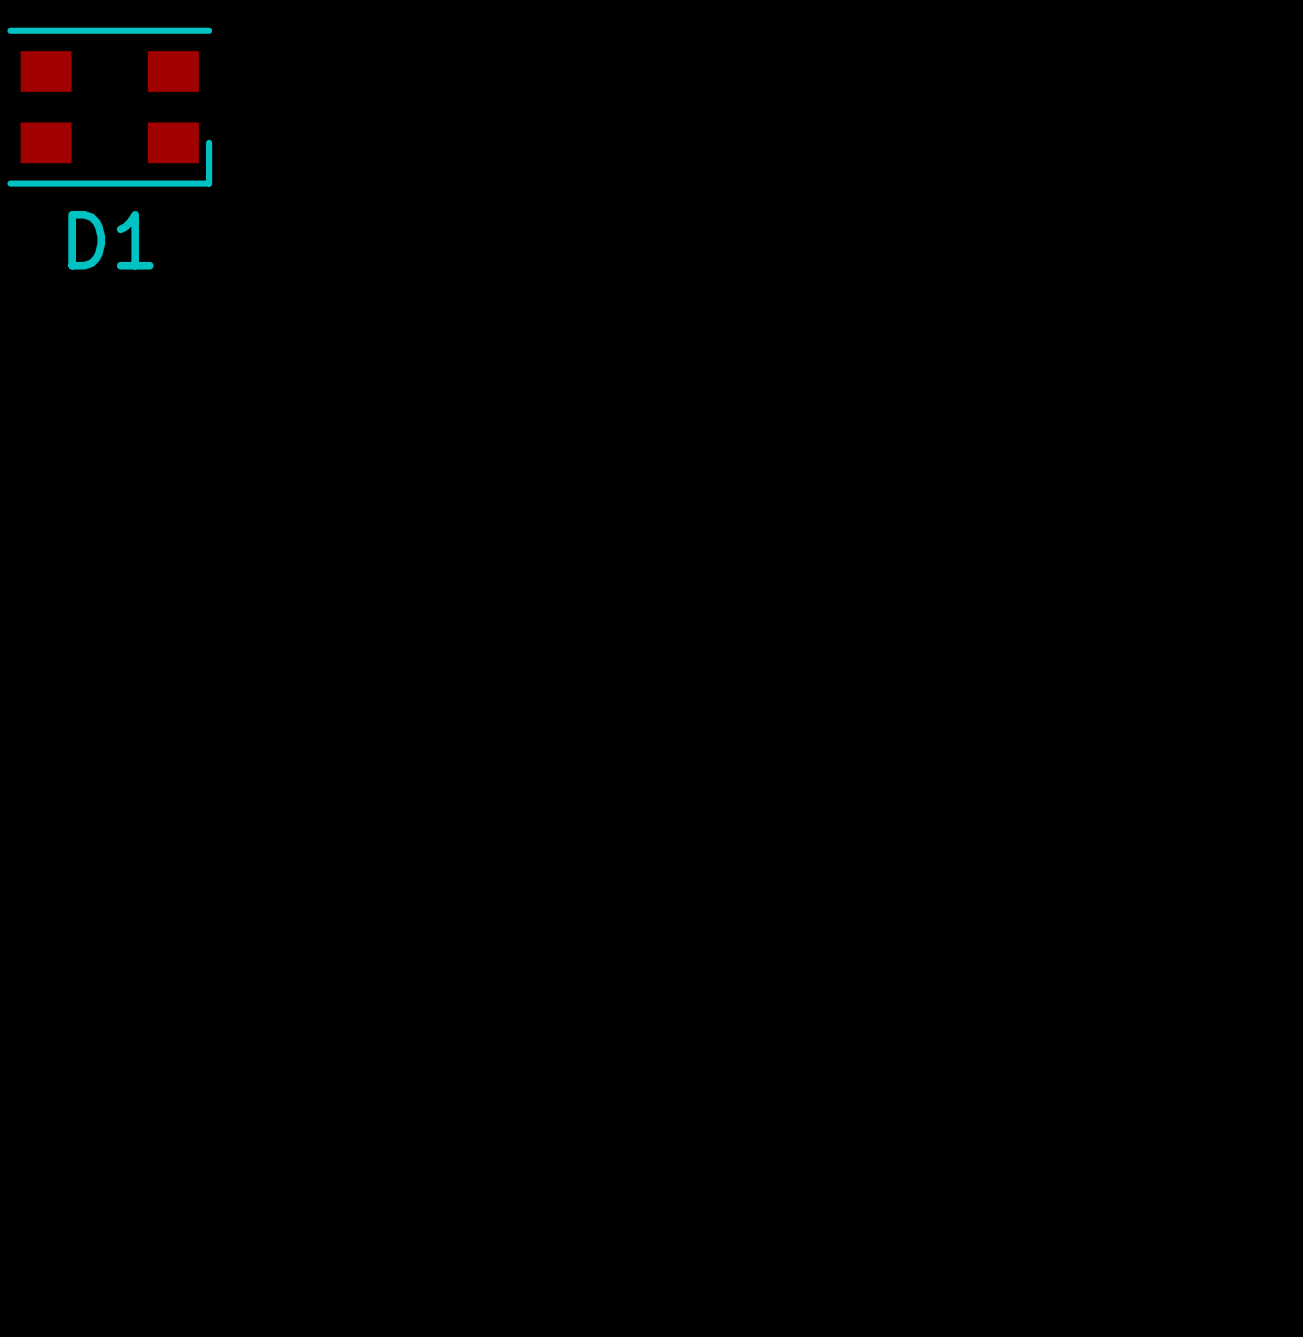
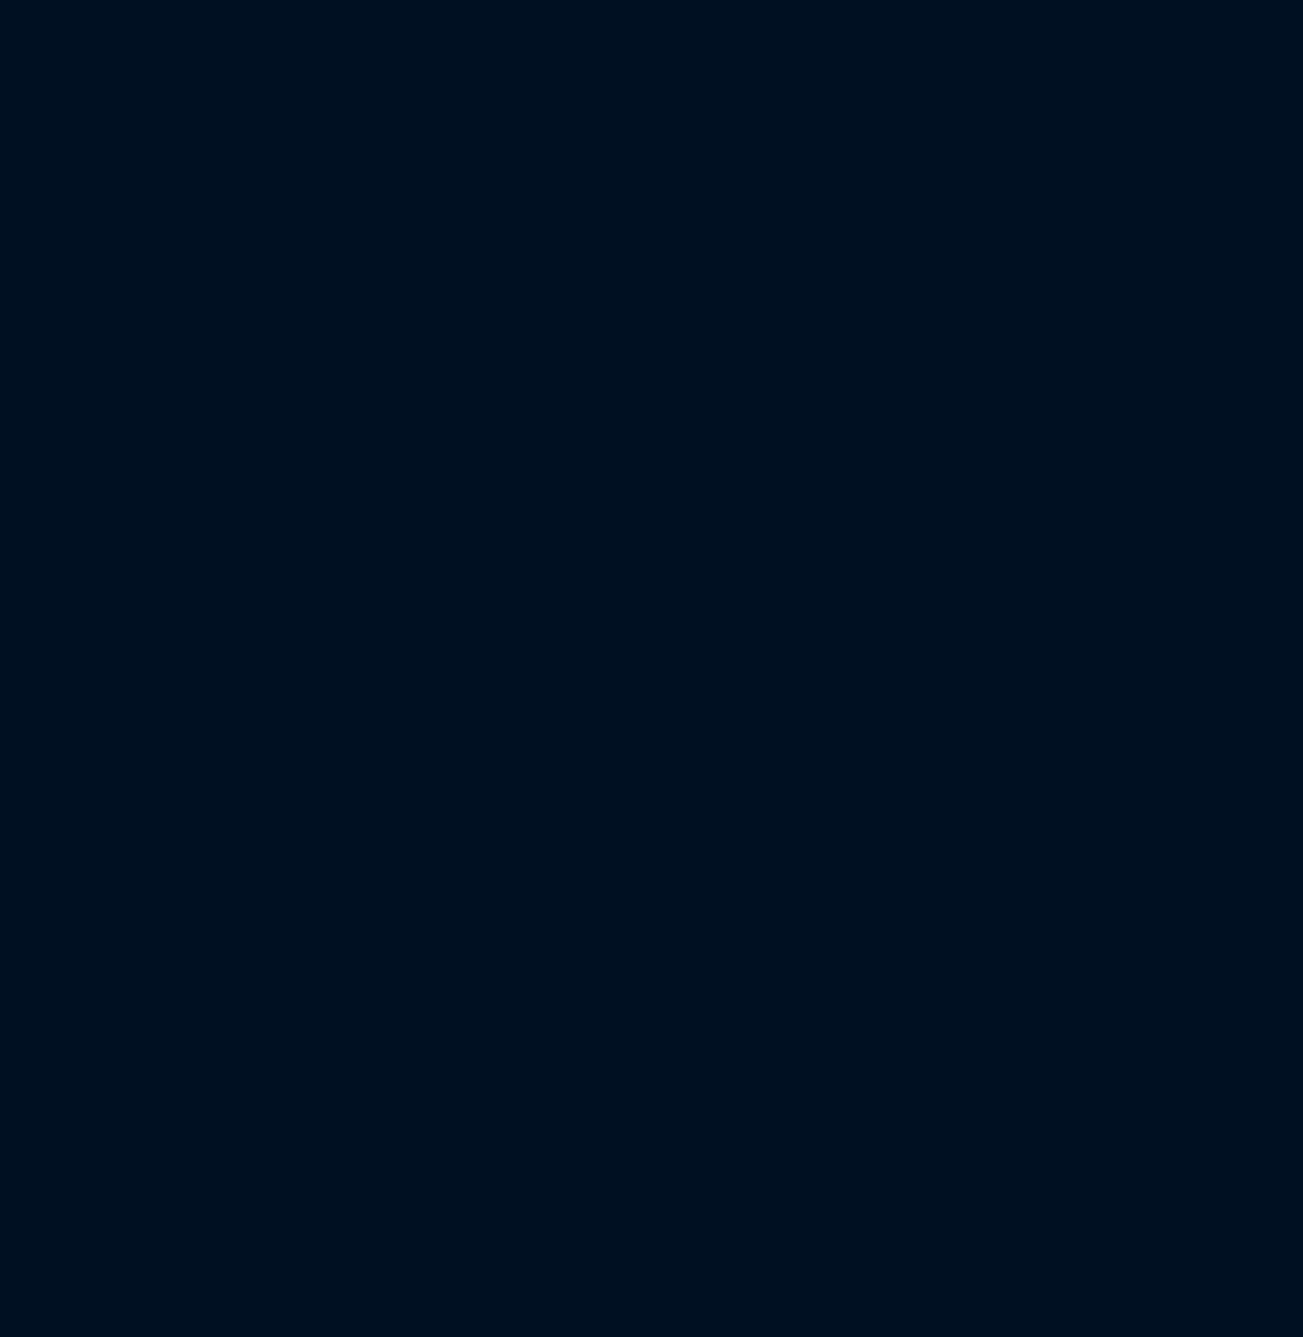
D1: (109, 107) -> none

